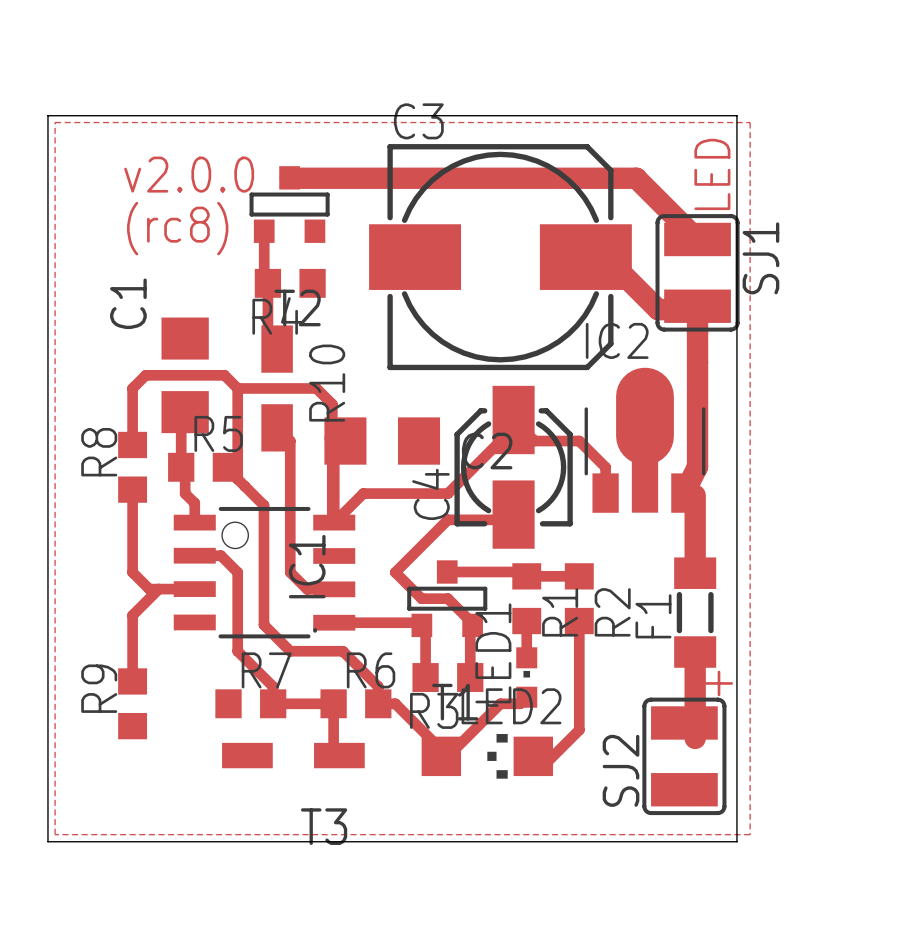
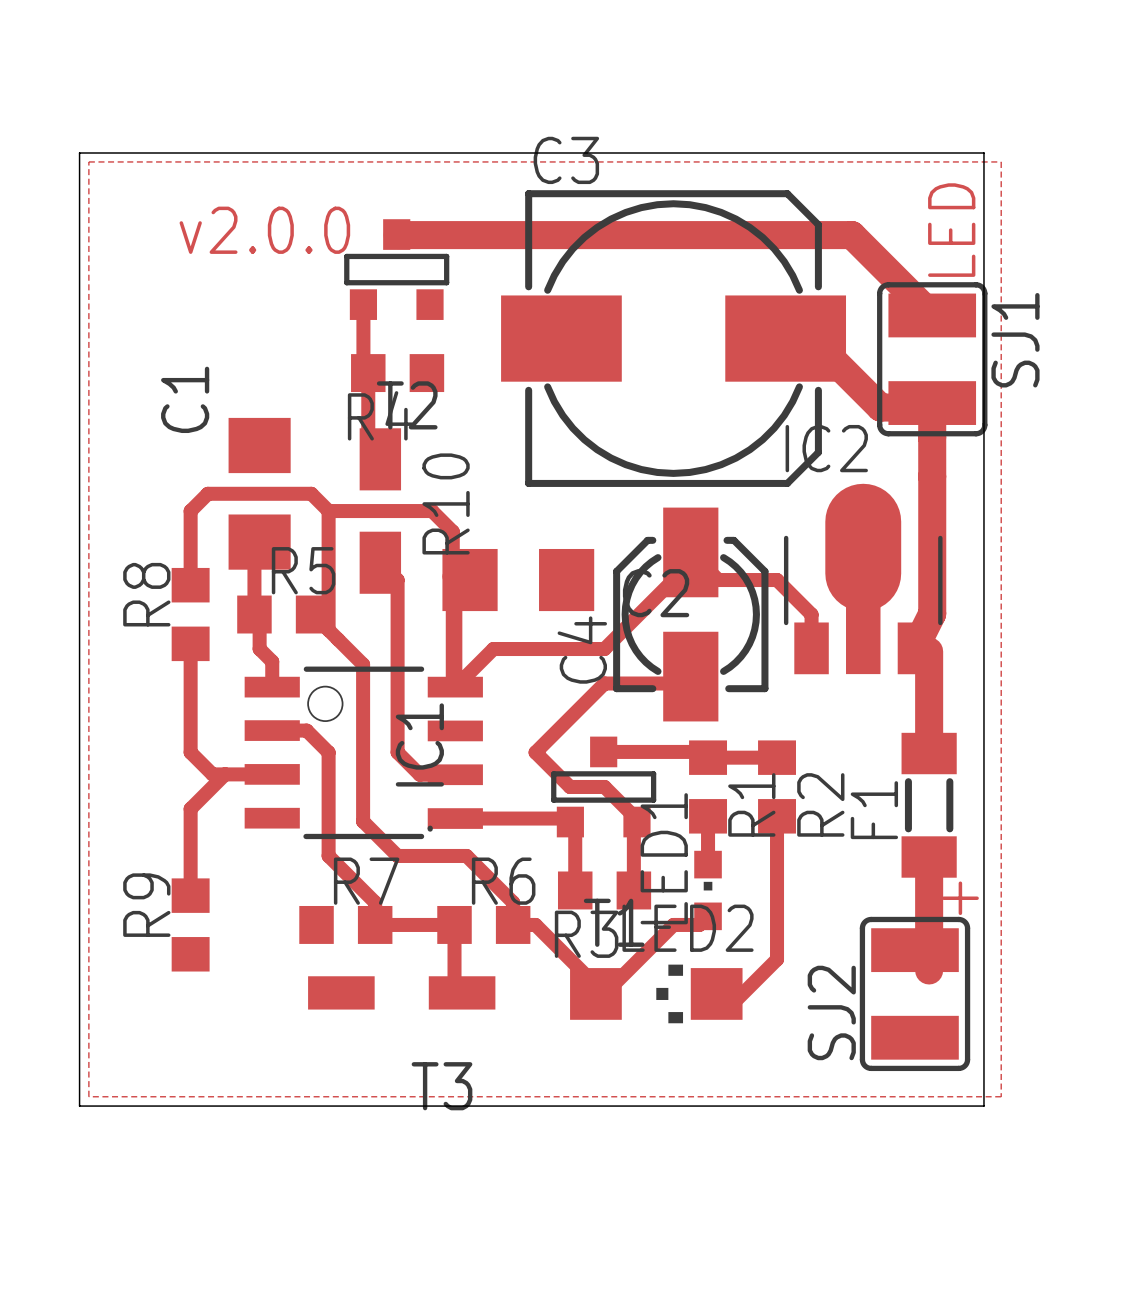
text: (rc8) (177, 228) -> none

